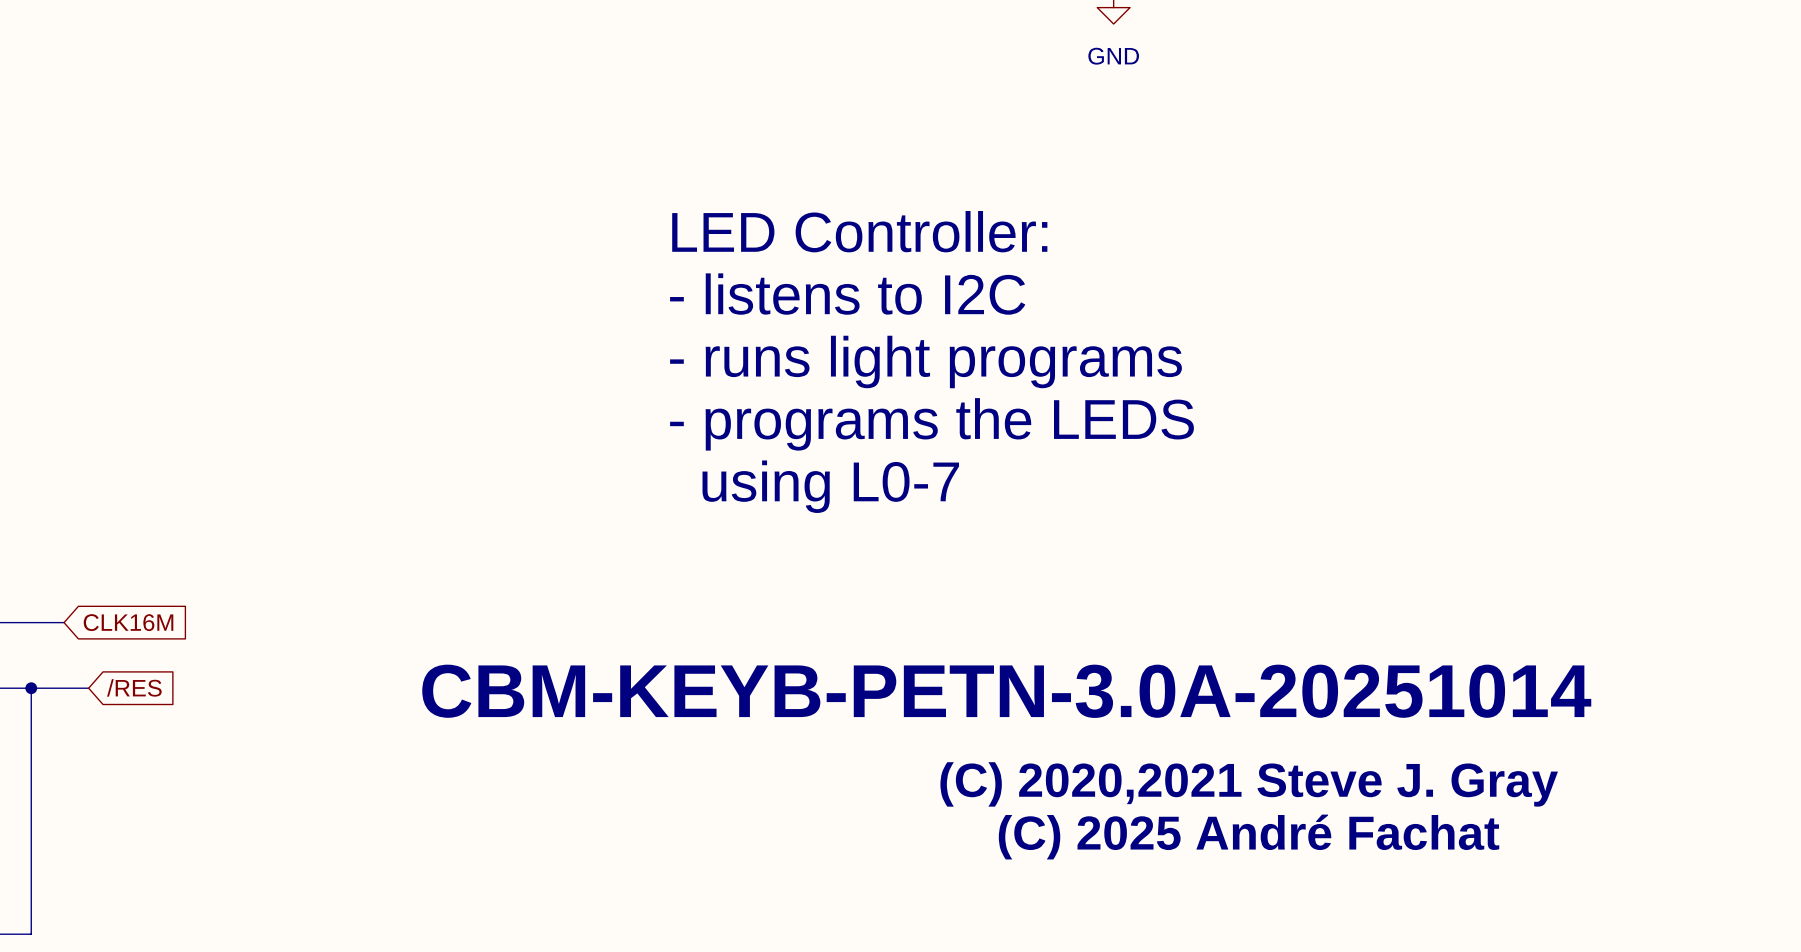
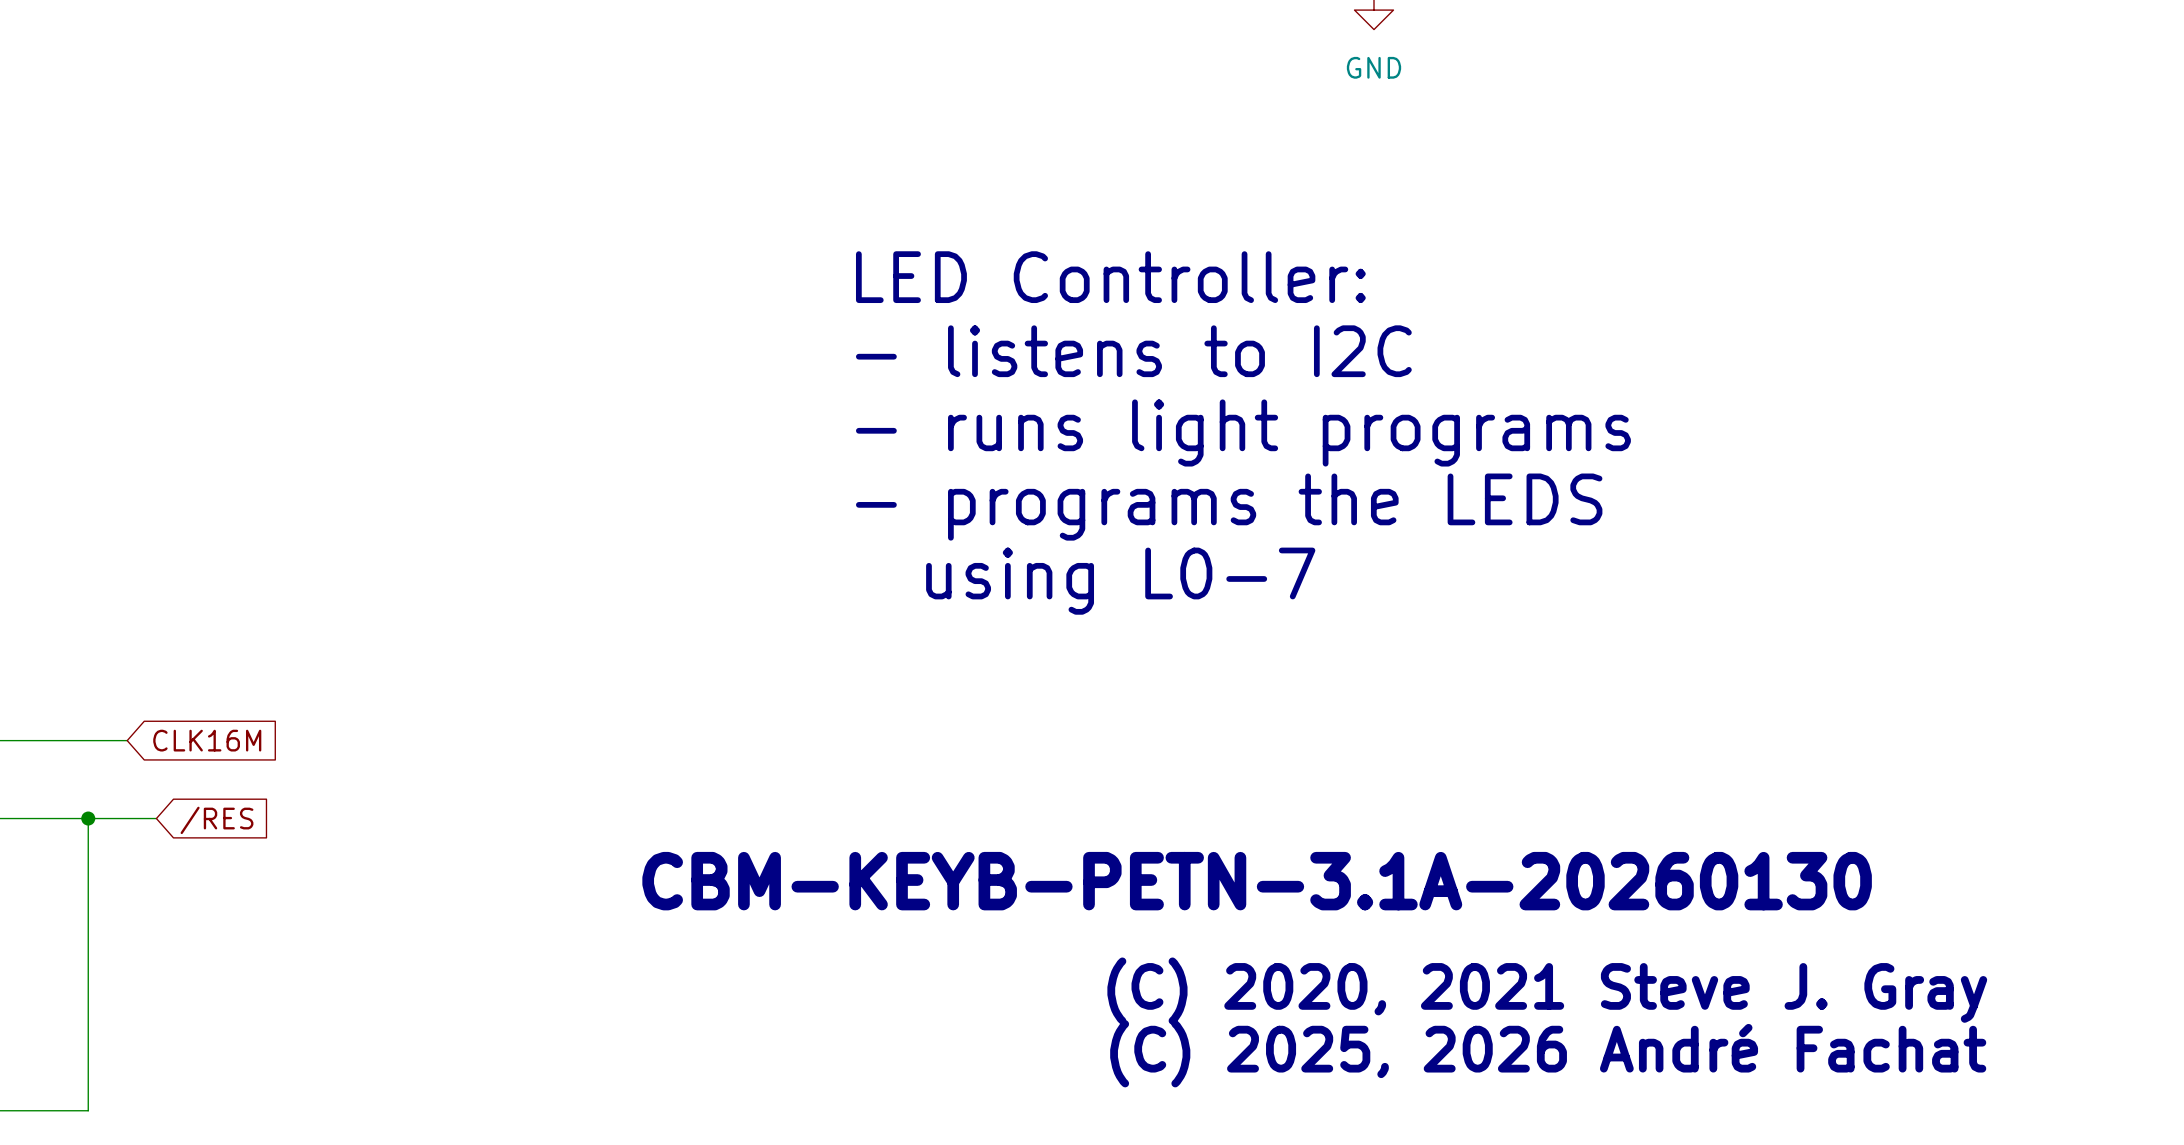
text: CBM-KEYB-PETN-3.0A-20251014 (1006, 691) -> CBM-KEYB-PETN-3.1A-20260130 (1257, 881)
text: (C) 2020,2021 Steve J. Gray (1249, 784) -> none
text: (C) 2025 André Fachat (1249, 837) -> (C) 2020, 2021 Steve J. Gray (1547, 991)
text: none -> (C) 2025, 2026 André Fachat (1548, 1053)

